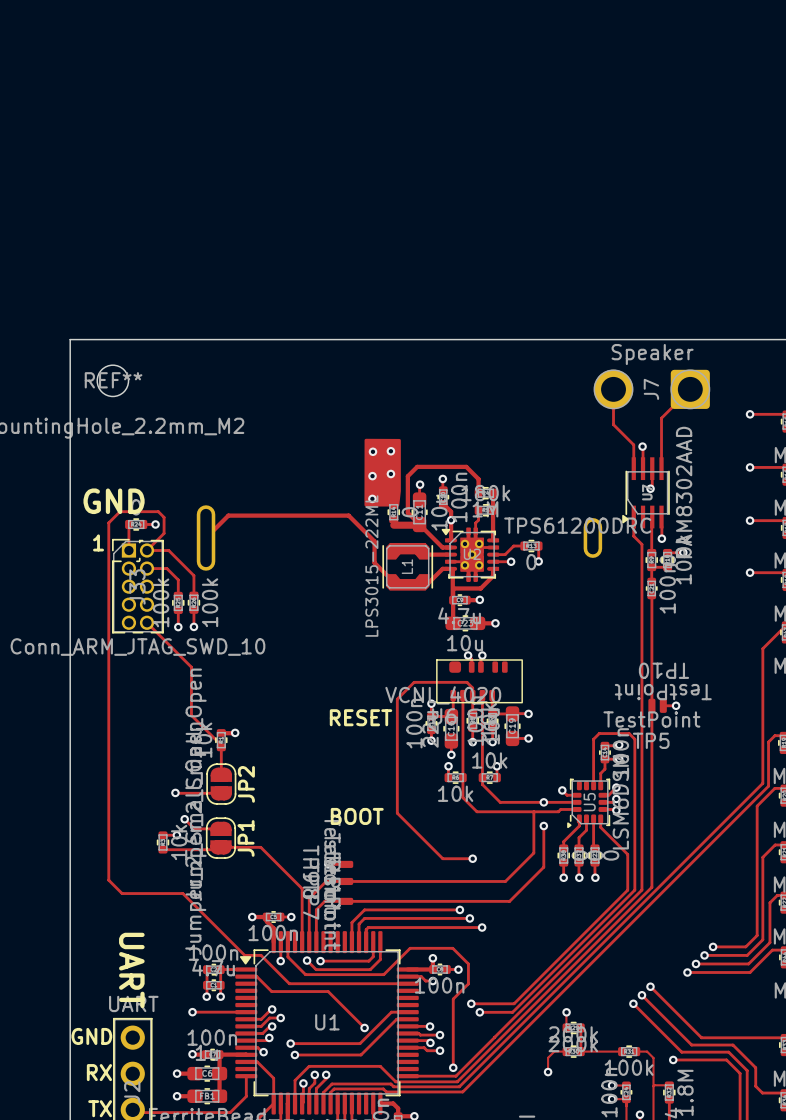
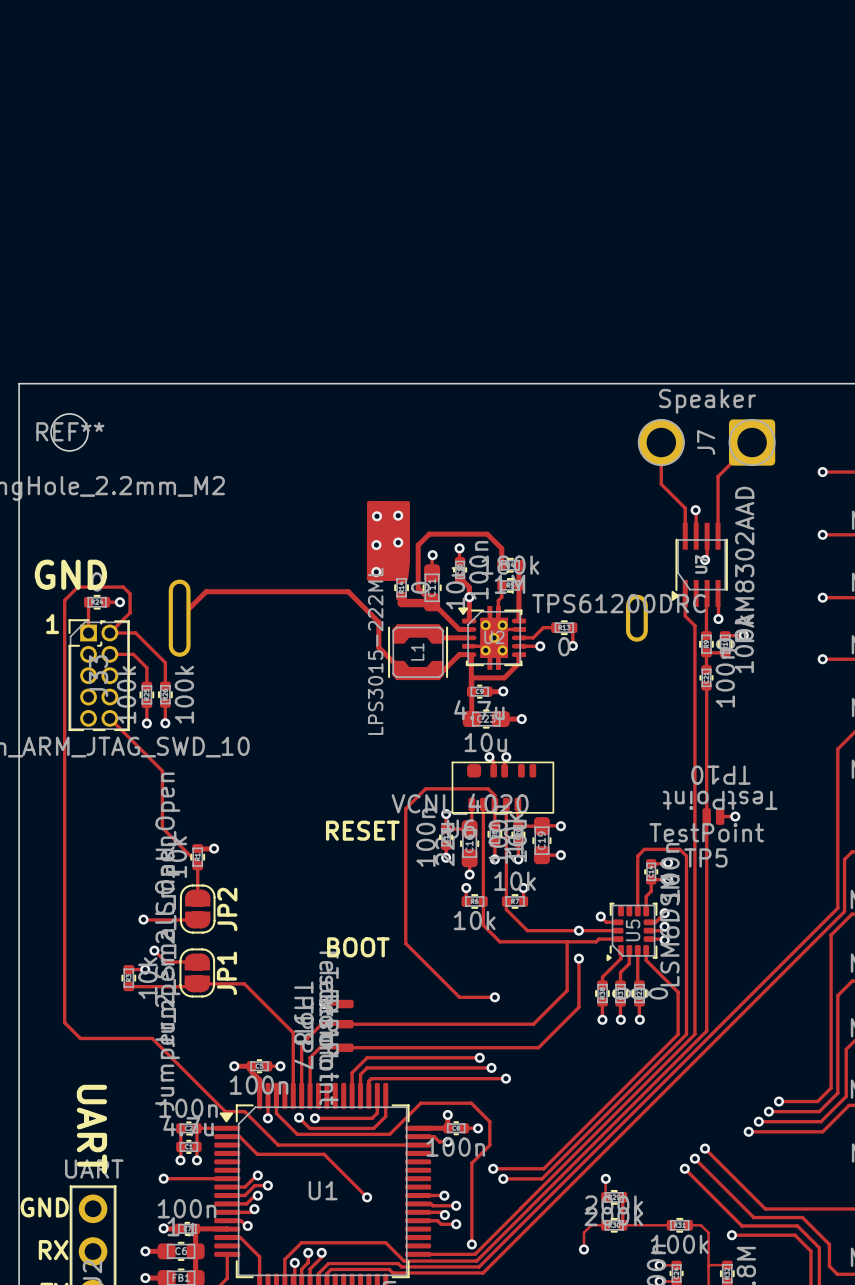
track: (407, 1012) (391, 1012) (360, 1043) (290, 1043) -> none
track: (407, 1019) (396, 1019) (361, 1054) (294, 1054) -> none
via: (290, 1043) -> none
via: (294, 1054) -> none

